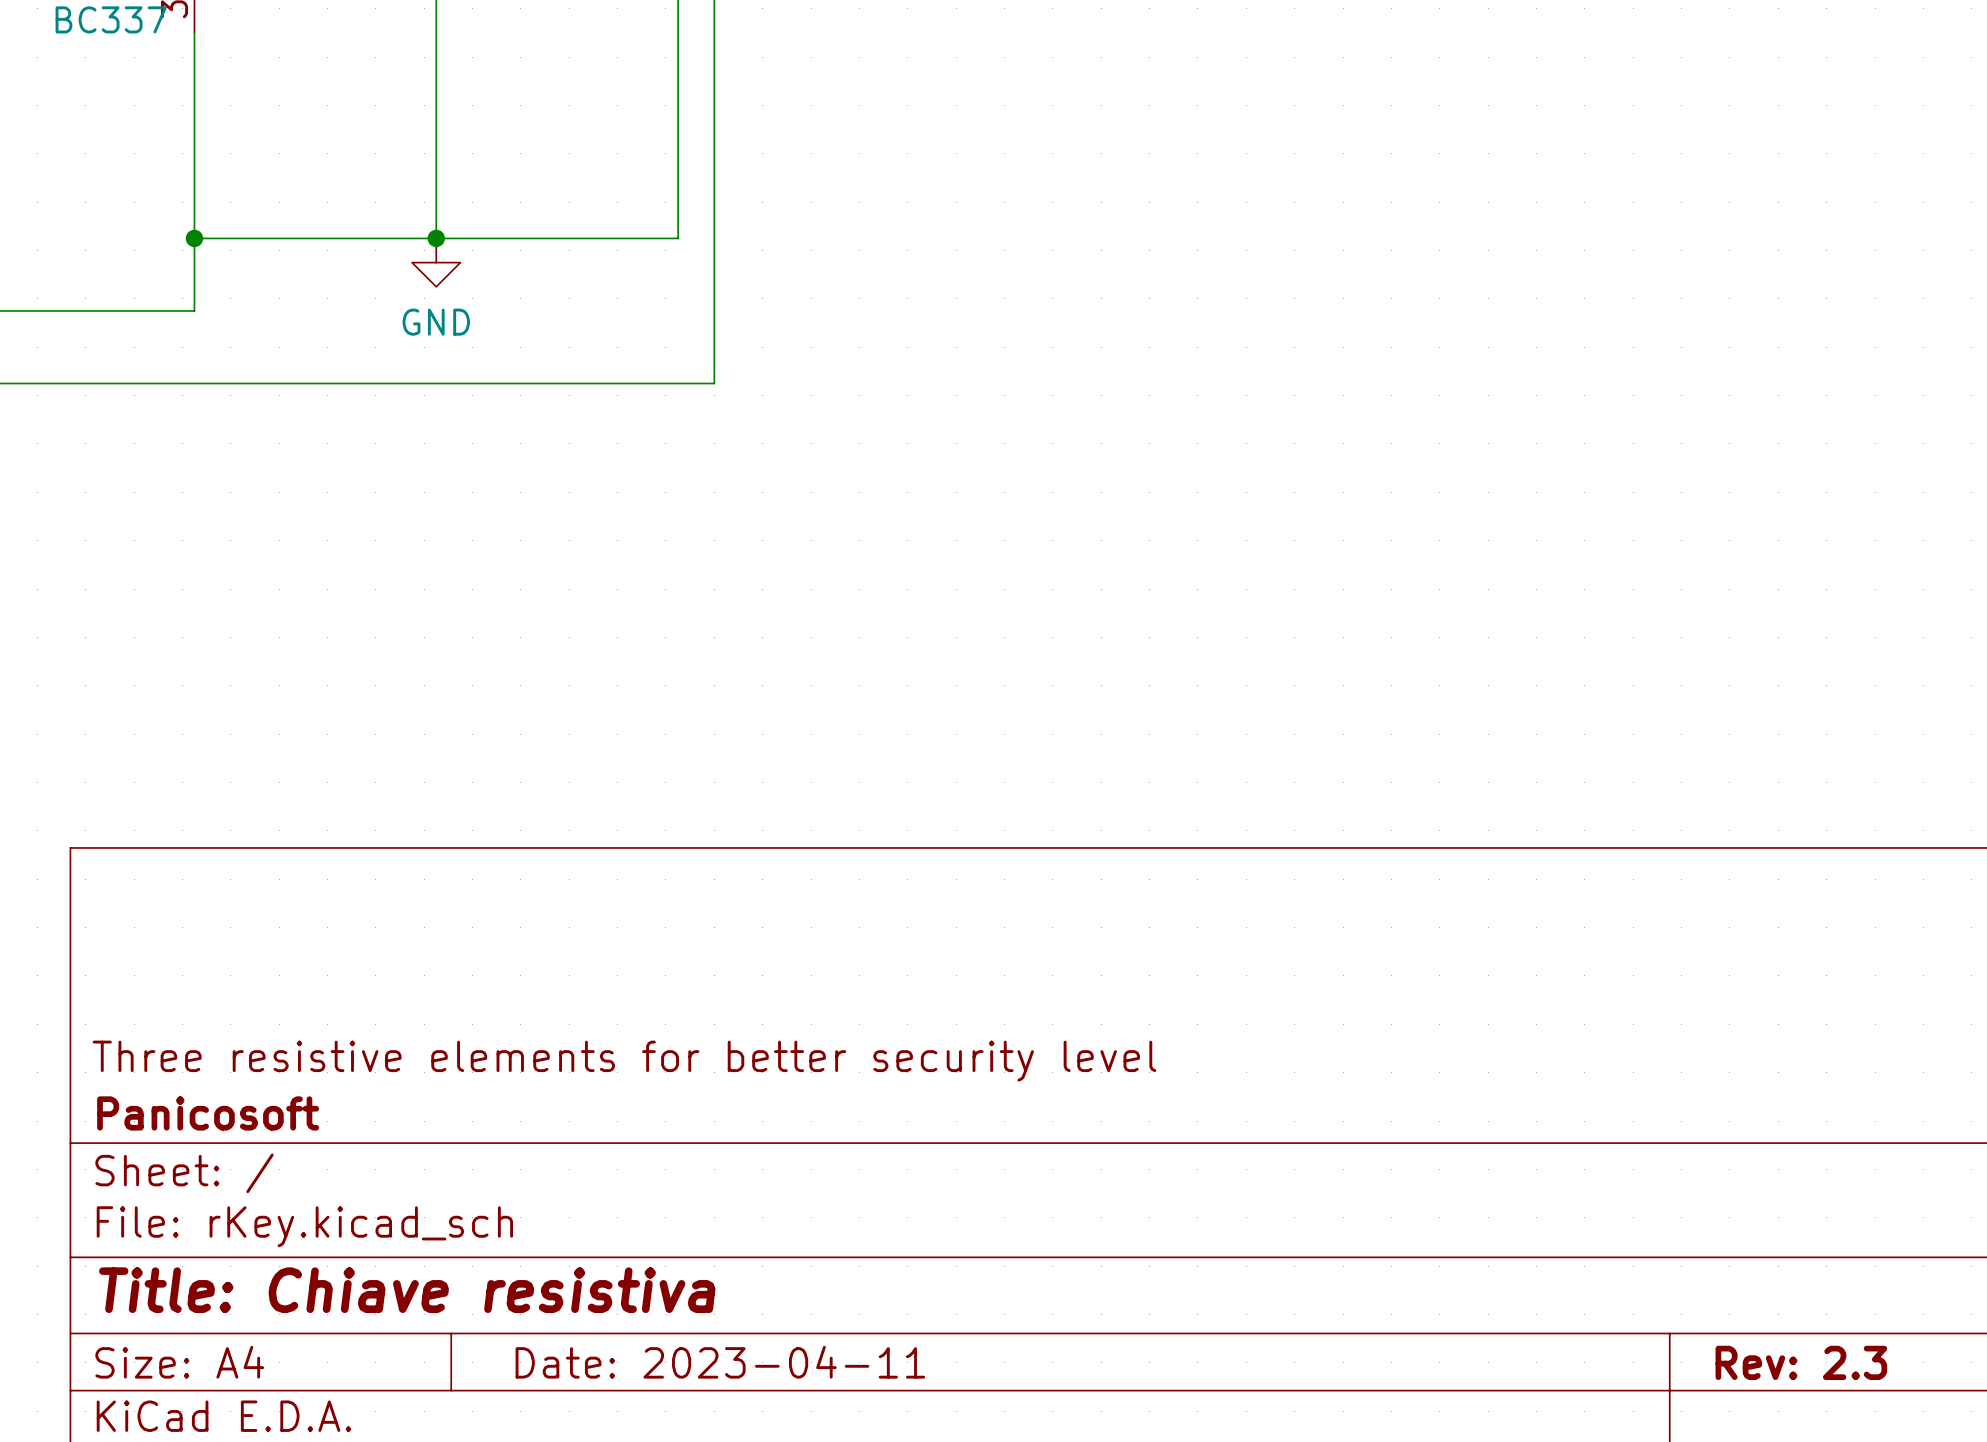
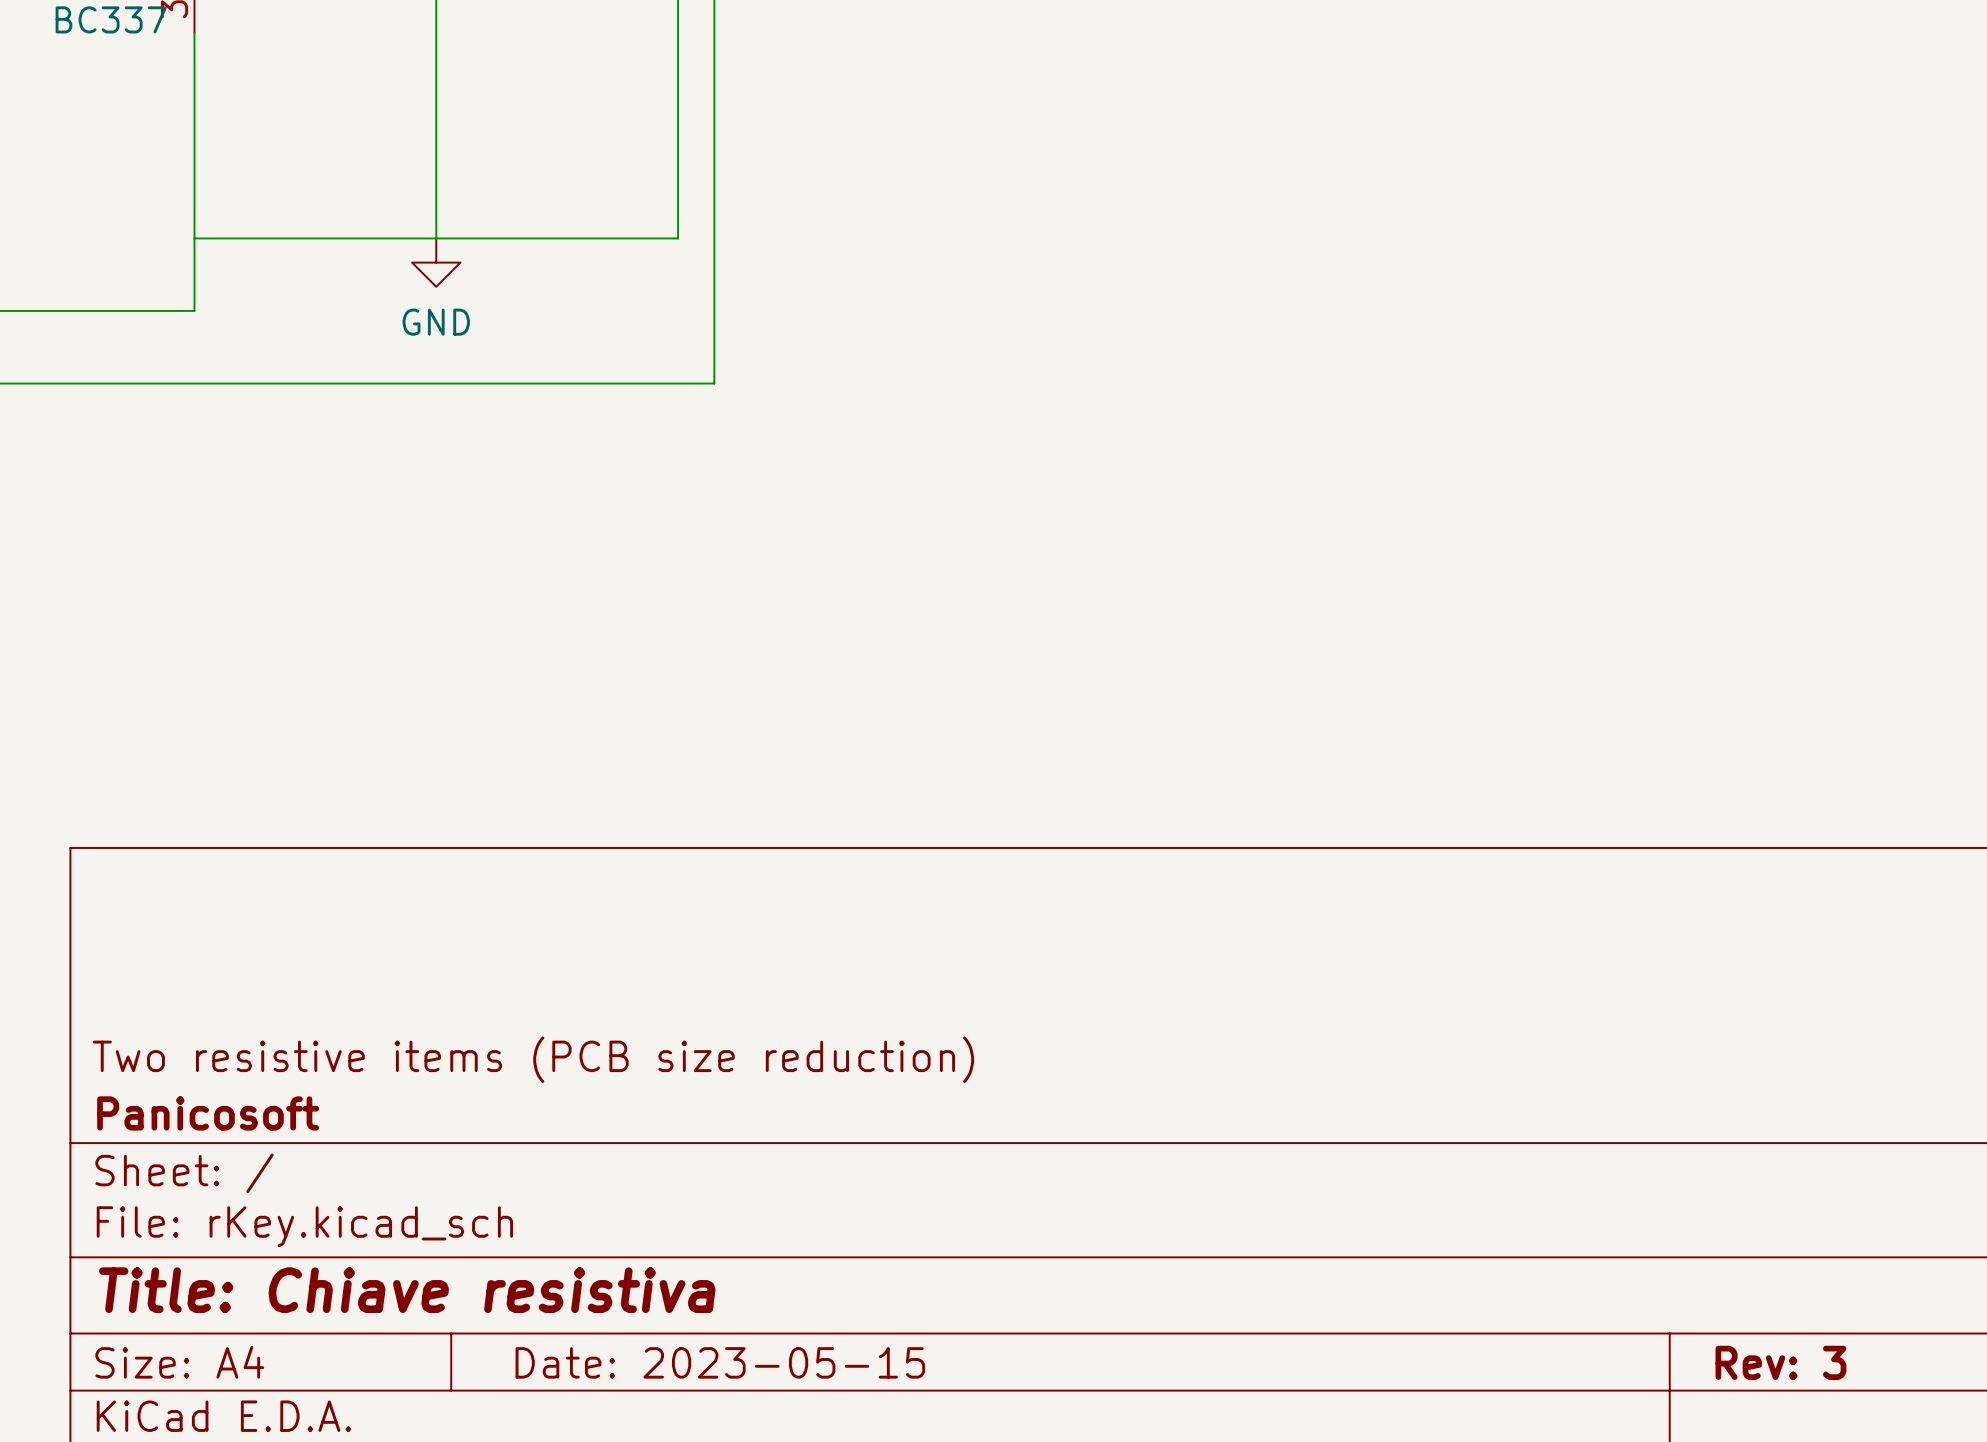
junction: (194, 238) -> none
junction: (436, 238) -> none
title block: Three resistive elements for better security level (624, 1061) -> Two resistive items (PCB size reduction) (533, 1059)
title block: Date: 2023-04-11 (720, 1362) -> Date: 2023-05-15 (720, 1362)
title block: Rev: 2.3 (1801, 1362) -> Rev: 3 (1780, 1362)

